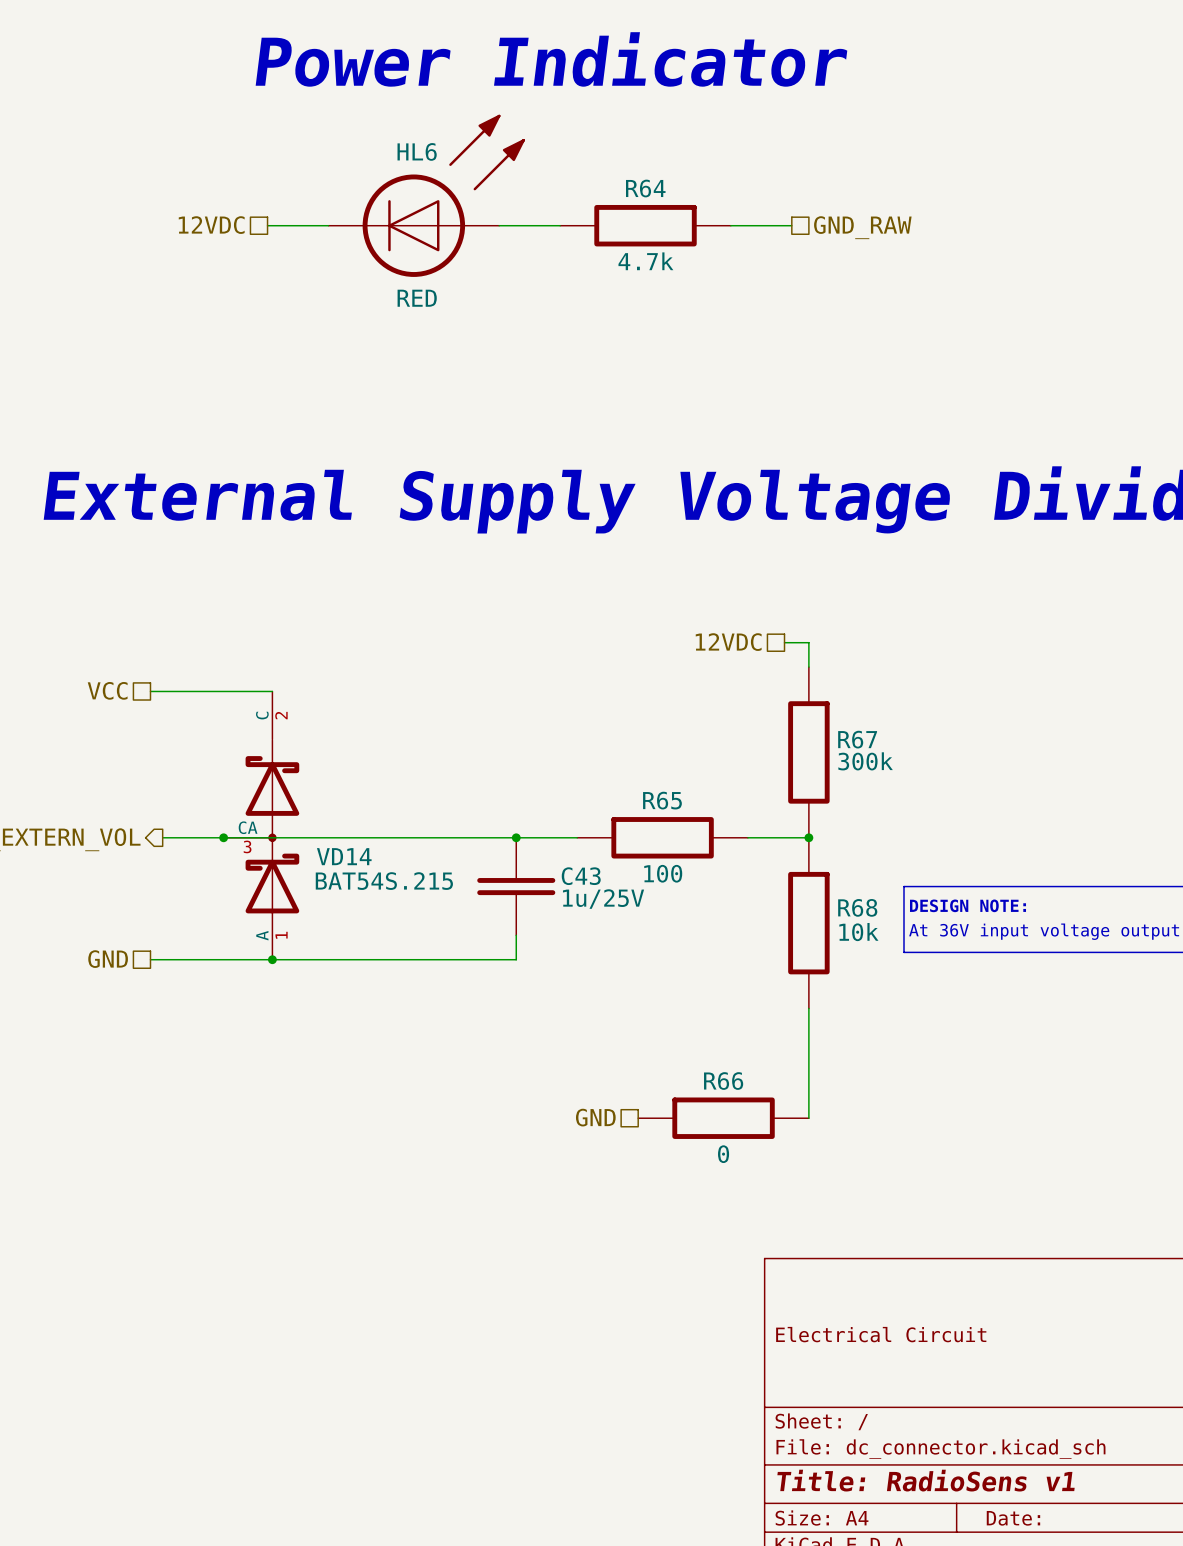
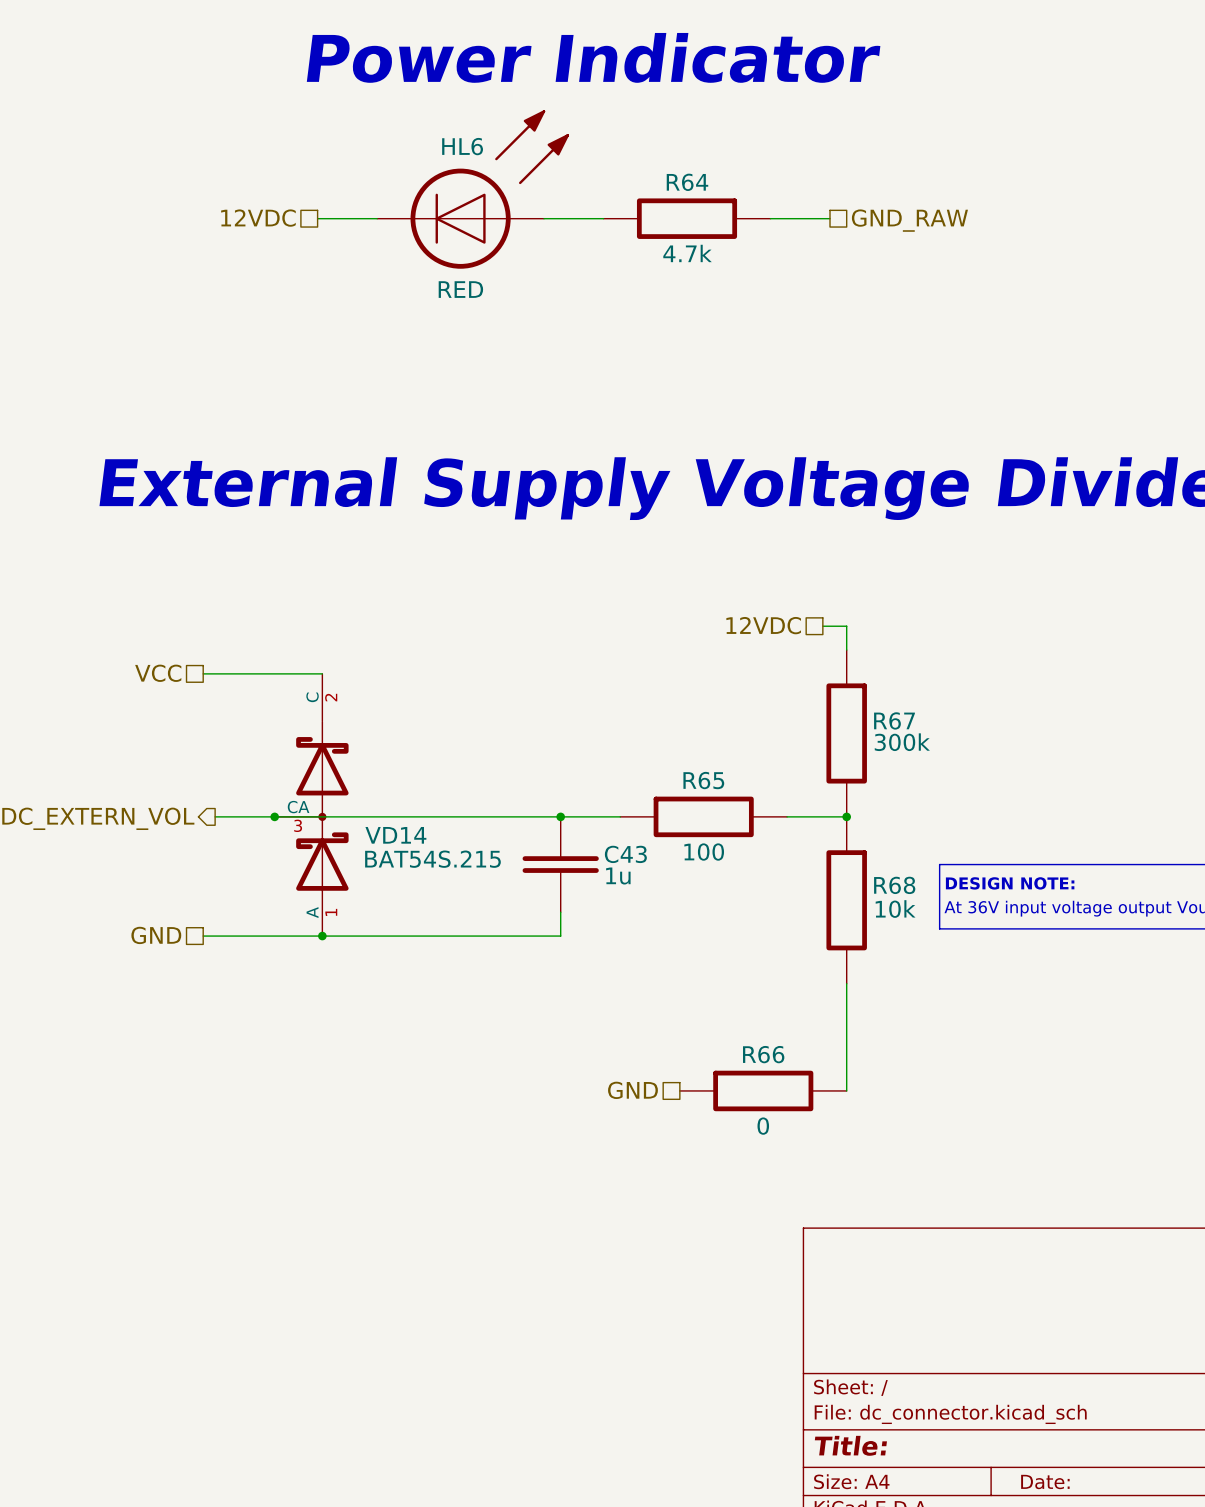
C43 value: 1u/25V (603, 899) -> 1u (618, 876)
title block: Electrical Circuit (881, 1334) -> none
title block: Title: RadioSens v1 (926, 1480) -> Title: (850, 1445)

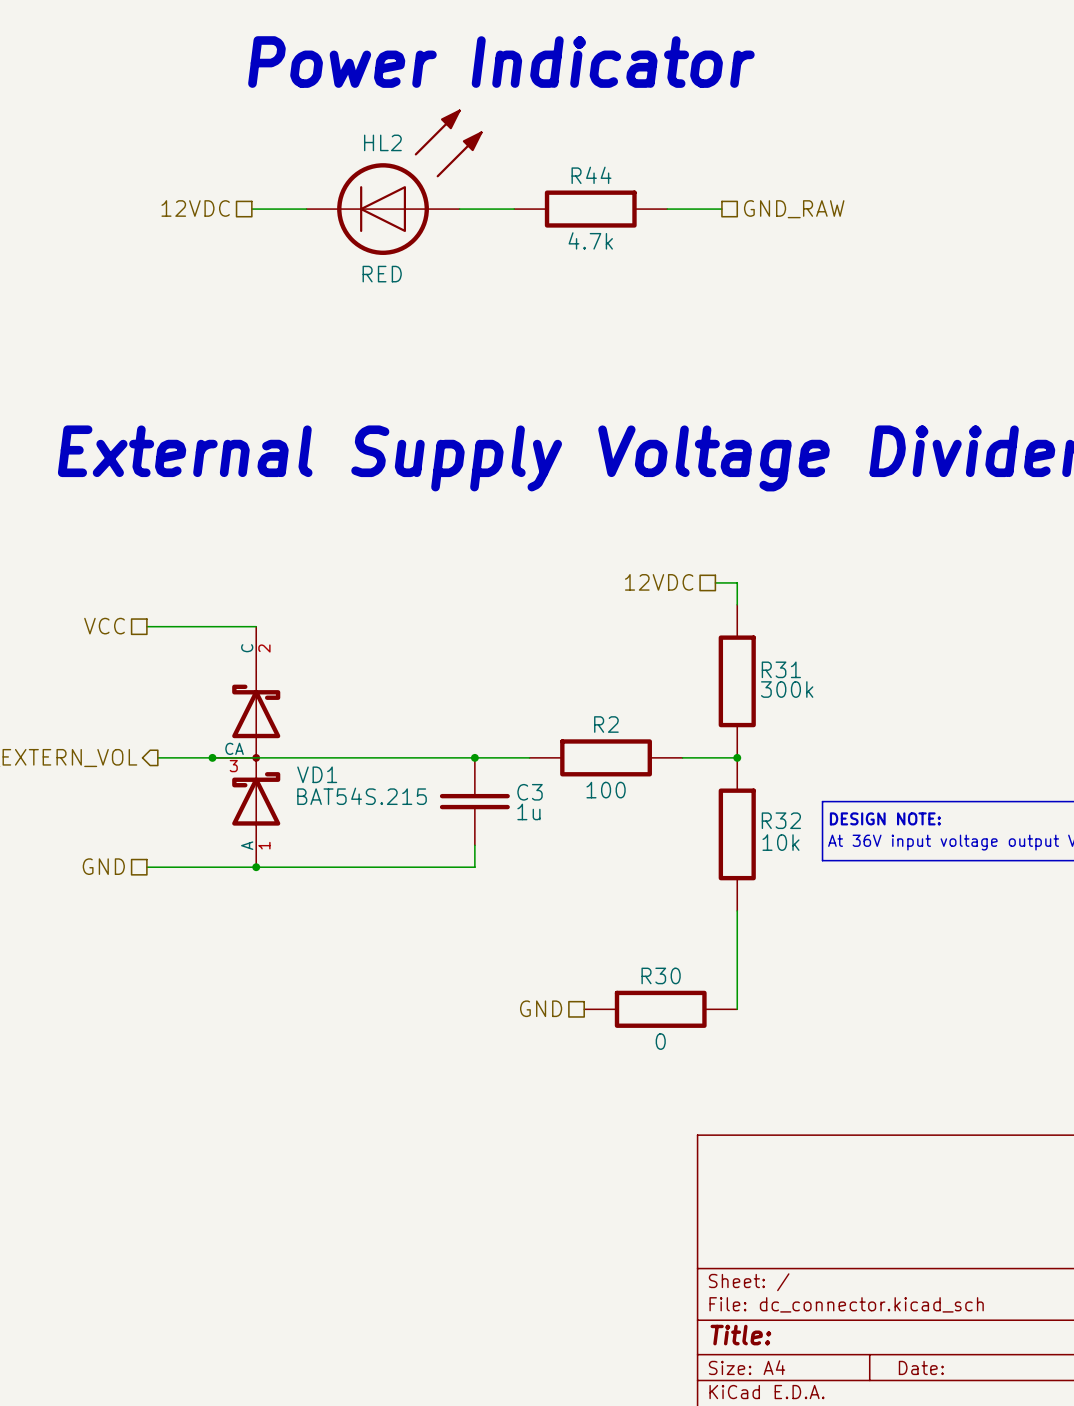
HL6 name: HL6 (462, 146) -> HL2 (382, 142)
R64 name: R64 (687, 182) -> R44 (591, 175)
R67 name: R67 (894, 720) -> R31 (781, 669)
R65 name: R65 (703, 780) -> R2 (606, 724)
VD14 name: VD14 (395, 835) -> VD1 (317, 774)
C43 name: C43 (625, 854) -> C3 (530, 792)
R68 name: R68 (894, 885) -> R32 (781, 820)
R66 name: R66 (763, 1054) -> R30 (661, 975)

